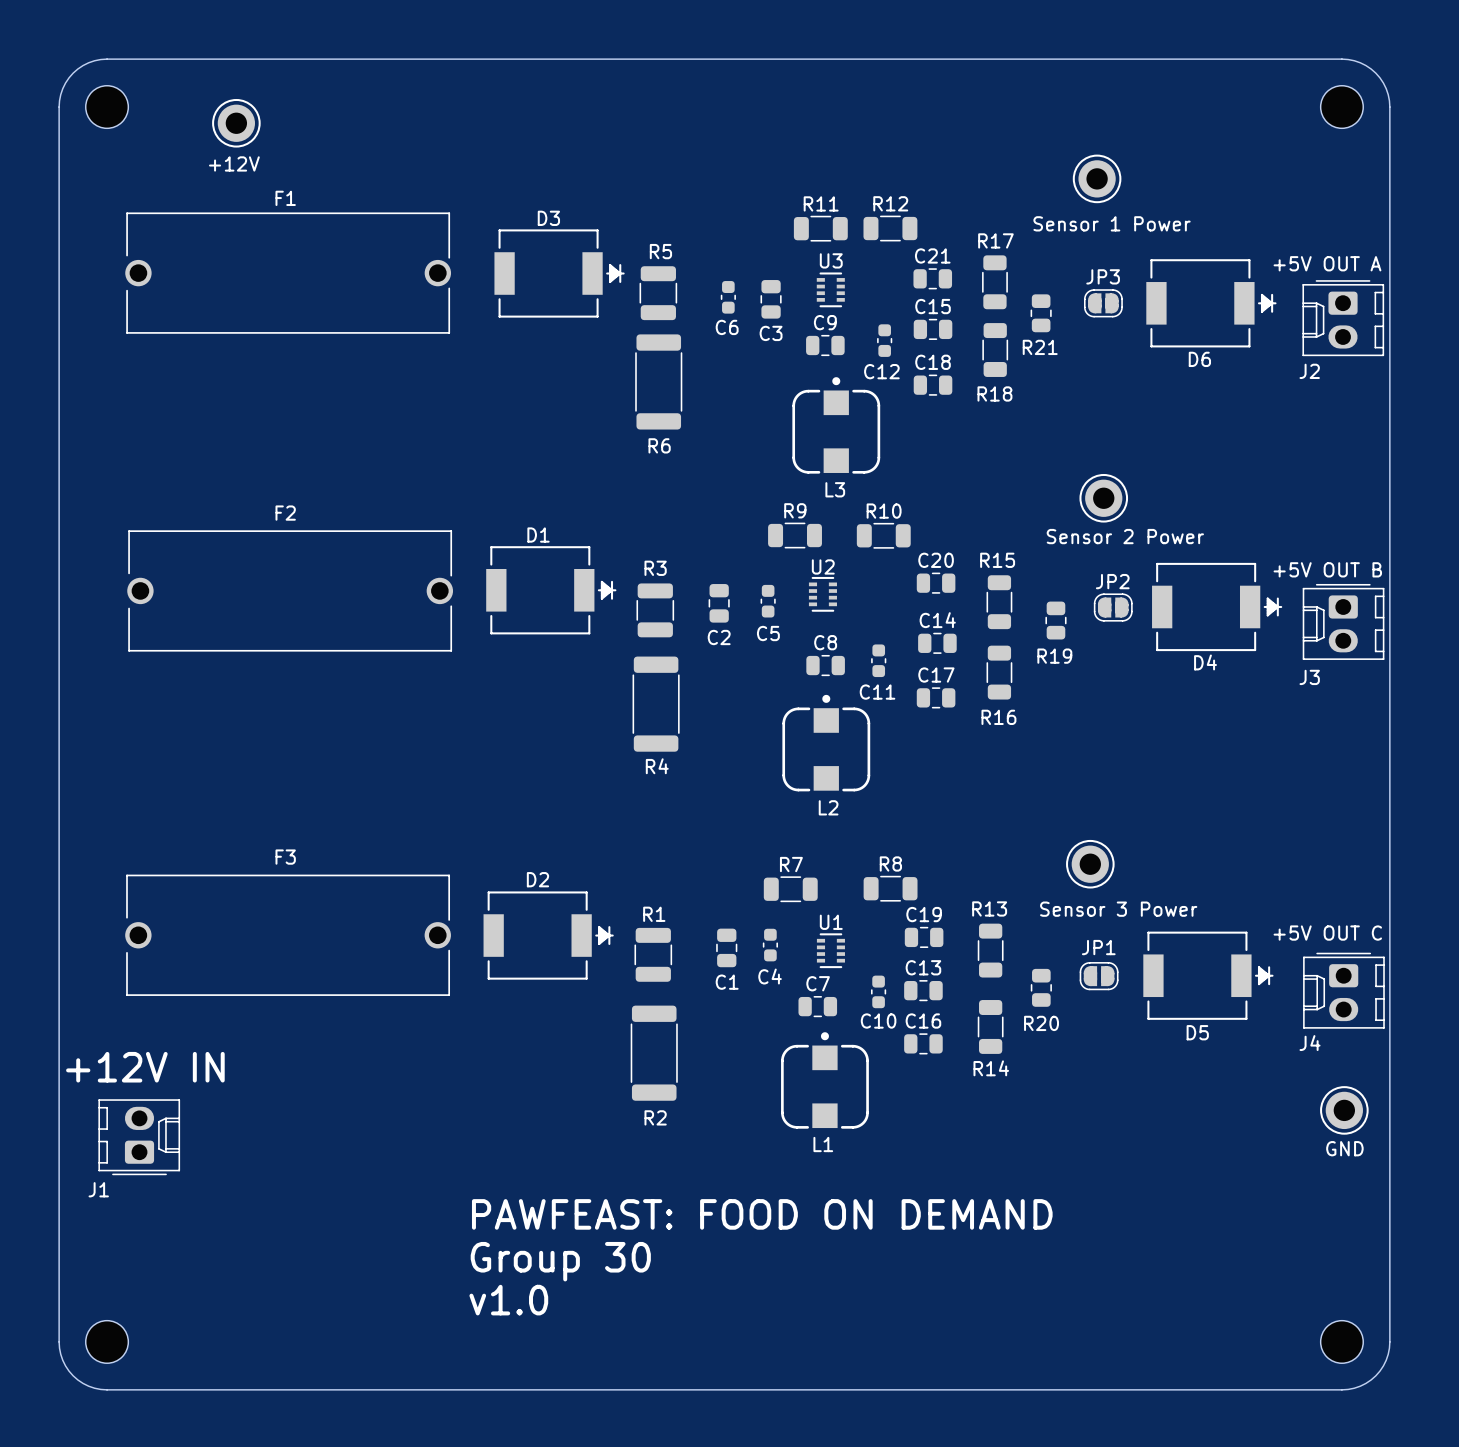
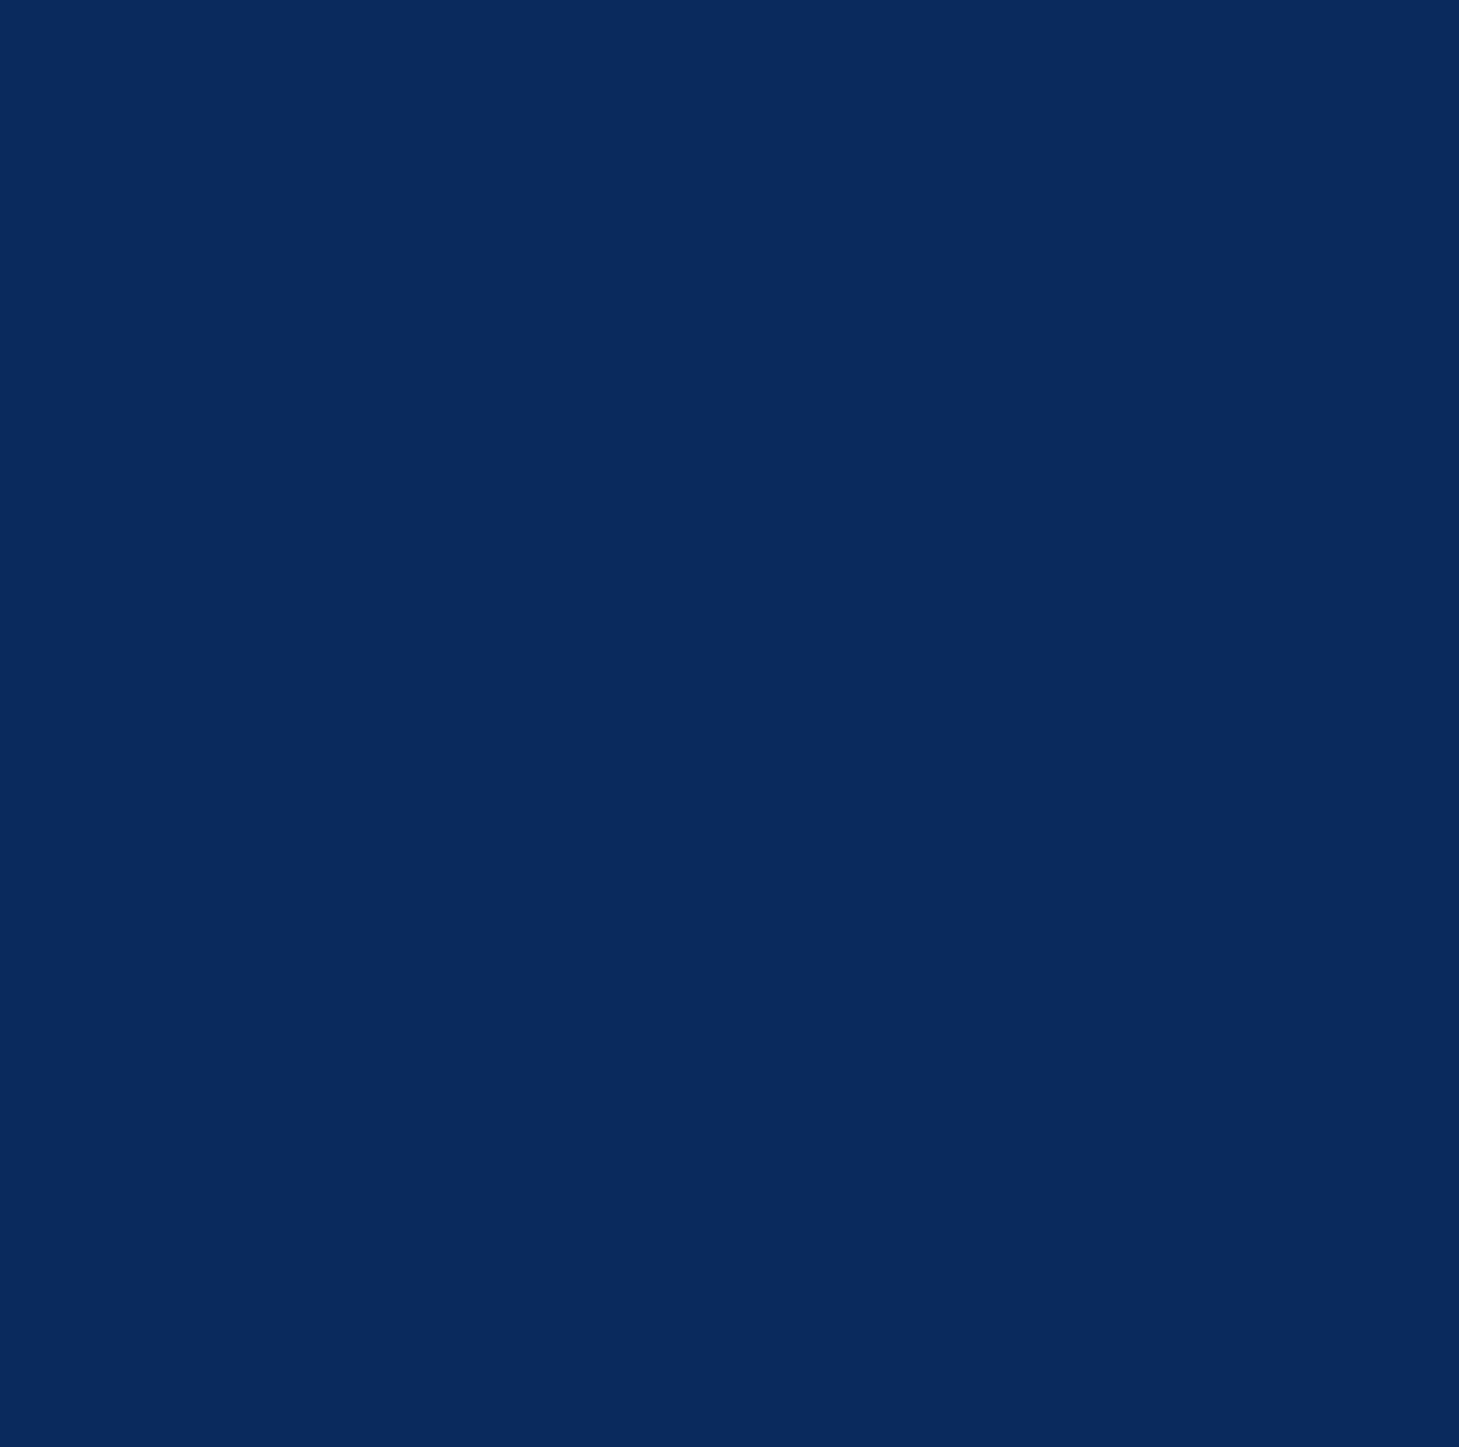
board edge: (107, 59) (1341, 59) (1360, 62) (1375, 73) (1386, 88) (1389, 107) (1389, 1341) (1386, 1360) (1375, 1375) (1360, 1386) (1341, 1389) (107, 1389) (88, 1386) (73, 1375) (62, 1360) (59, 1341) (59, 107) (62, 88) (73, 73) (88, 62) (107, 59) -> none
part: (107, 107) -> none
part: (1341, 107) -> none
part: (236, 123) -> none
text: +12V (234, 163) -> none
part: (1097, 178) -> none
text: Sensor 1 Power (1112, 223) -> none
R11: (820, 228) -> none
R12: (890, 228) -> none
text: +5V OUT A (1327, 263) -> none
F1: (288, 273) -> none
D3: (559, 273) -> none
C21: (932, 278) -> none
R17: (994, 282) -> none
U3: (830, 289) -> none
R5: (658, 293) -> none
C6: (728, 297) -> none
C3: (771, 299) -> none
JP3: (1103, 303) -> none
D6: (1211, 303) -> none
R21: (1041, 313) -> none
J2: (1343, 318) -> none
C15: (933, 329) -> none
C12: (884, 340) -> none
C9: (825, 345) -> none
R18: (995, 350) -> none
R6: (658, 381) -> none
C18: (933, 385) -> none
L3: (836, 425) -> none
part: (1103, 498) -> none
R9: (795, 535) -> none
R10: (883, 535) -> none
text: Sensor 2 Power (1125, 536) -> none
text: +5V OUT B (1327, 569) -> none
C20: (936, 583) -> none
F2: (290, 590) -> none
D1: (551, 590) -> none
U2: (822, 594) -> none
C5: (768, 601) -> none
R15: (999, 602) -> none
C2: (719, 603) -> none
D4: (1217, 606) -> none
JP2: (1113, 607) -> none
R3: (655, 610) -> none
R19: (1055, 620) -> none
J3: (1343, 621) -> none
C14: (937, 643) -> none
C11: (878, 660) -> none
C8: (825, 665) -> none
R16: (999, 672) -> none
C17: (936, 697) -> none
R4: (656, 704) -> none
L2: (826, 743) -> none
part: (1090, 864) -> none
R8: (890, 888) -> none
R7: (790, 889) -> none
text: Sensor 3 Power (1118, 909) -> none
text: +5V OUT C (1327, 933) -> none
F3: (288, 935) -> none
D2: (548, 935) -> none
C19: (924, 937) -> none
C4: (770, 945) -> none
C1: (726, 947) -> none
U1: (830, 950) -> none
R13: (990, 950) -> none
R1: (653, 954) -> none
D5: (1208, 975) -> none
JP1: (1099, 976) -> none
R20: (1041, 987) -> none
C13: (923, 990) -> none
J4: (1343, 990) -> none
C10: (878, 991) -> none
C7: (817, 1006) -> none
R14: (990, 1026) -> none
C16: (923, 1043) -> none
R2: (654, 1053) -> none
text: +12V IN (145, 1067) -> none
L1: (824, 1080) -> none
part: (1344, 1110) -> none
J1: (139, 1137) -> none
text: GND (1344, 1148) -> none
text: PAWFEAST: FOOD ON DEMAND (762, 1214) -> none
text: Group 30 (560, 1261) -> none
text: v1.0 (508, 1300) -> none
part: (107, 1341) -> none
part: (1341, 1341) -> none

